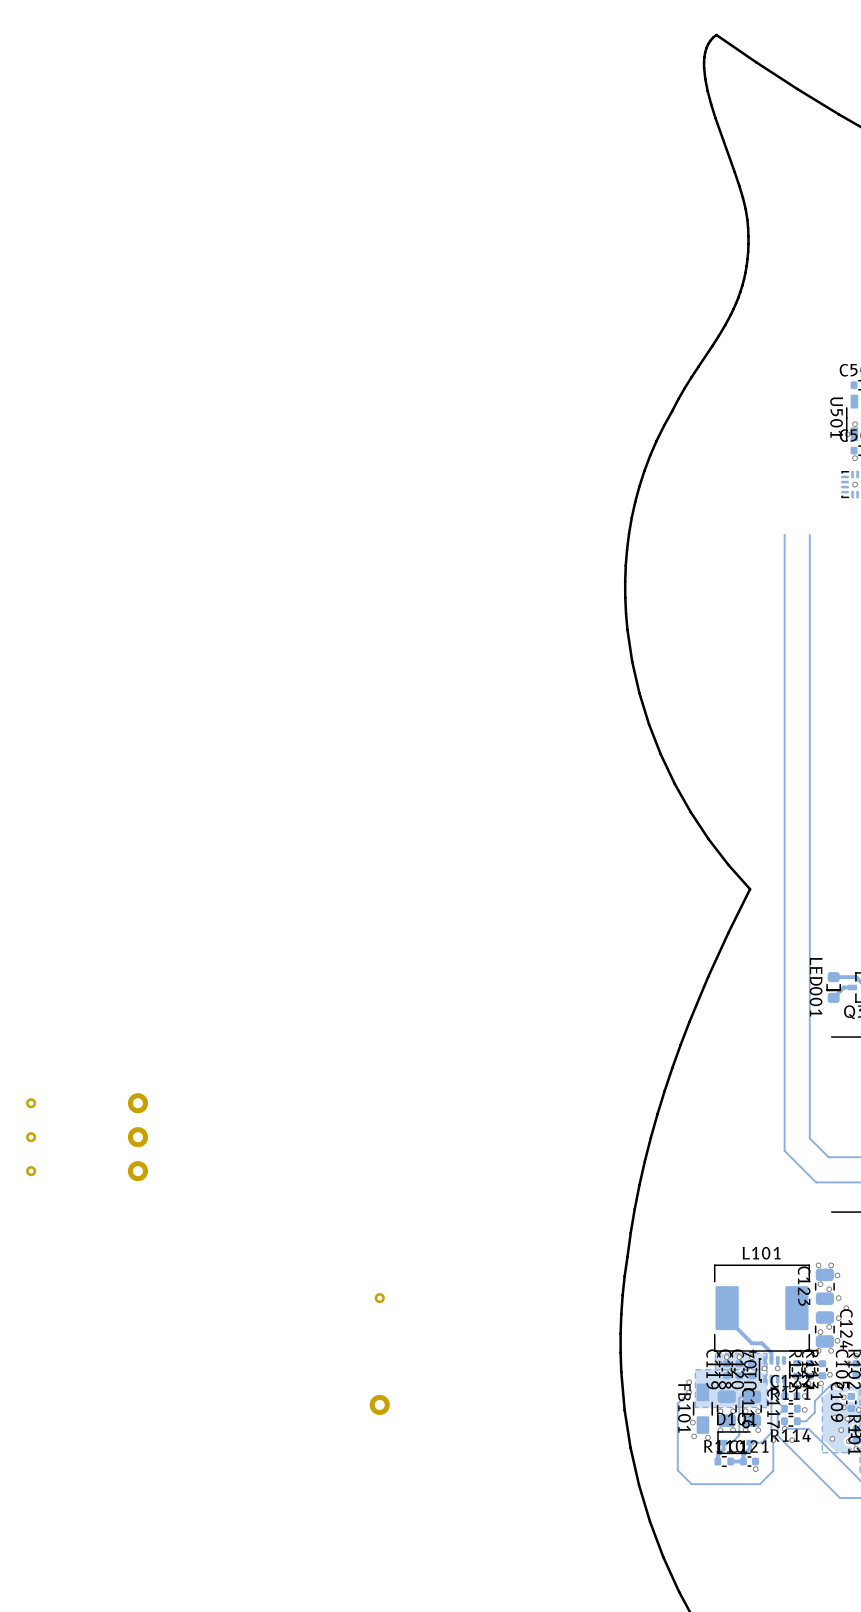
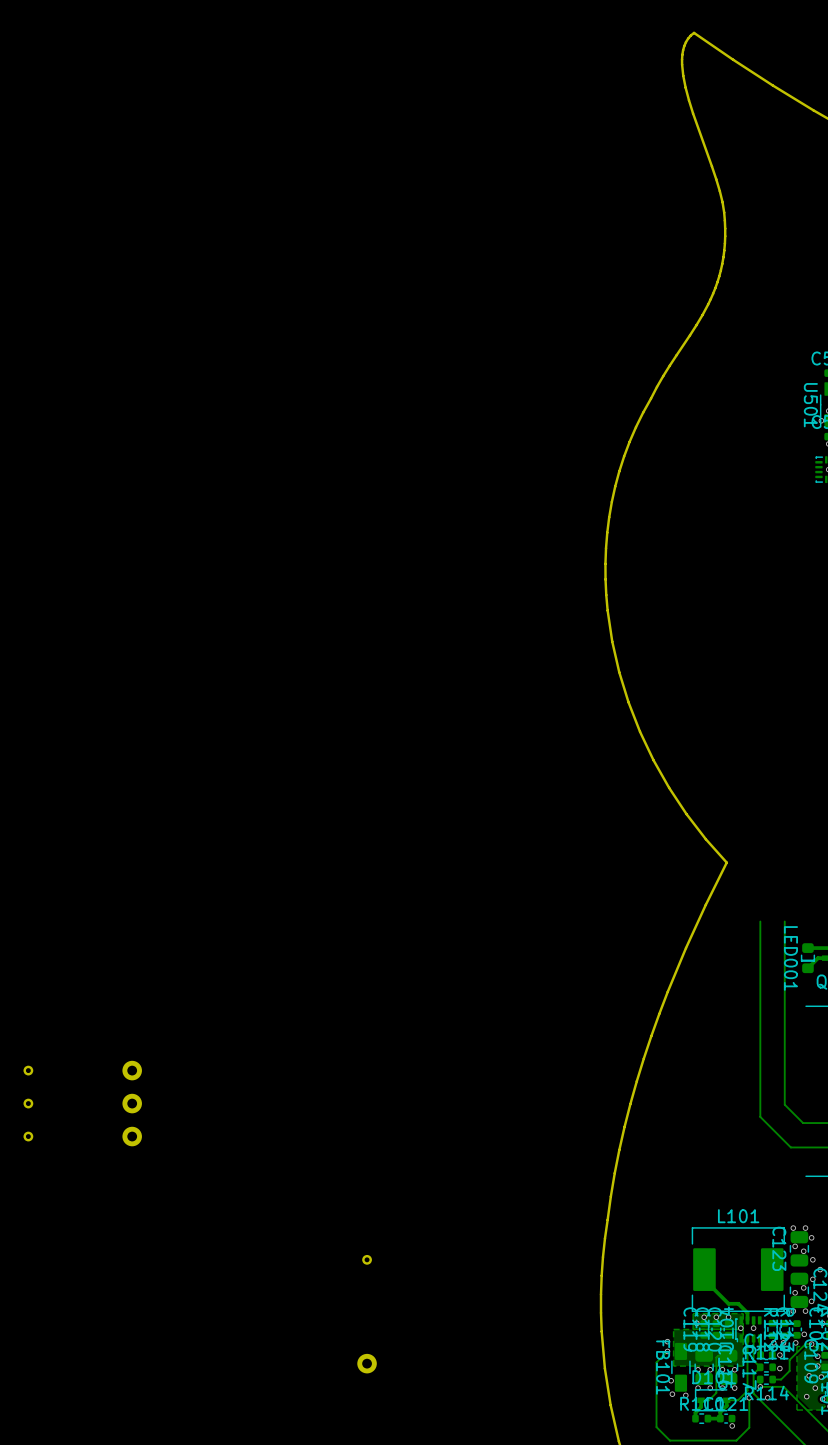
track: (784, 534) (784, 949) -> none
track: (809, 534) (809, 949) -> none

